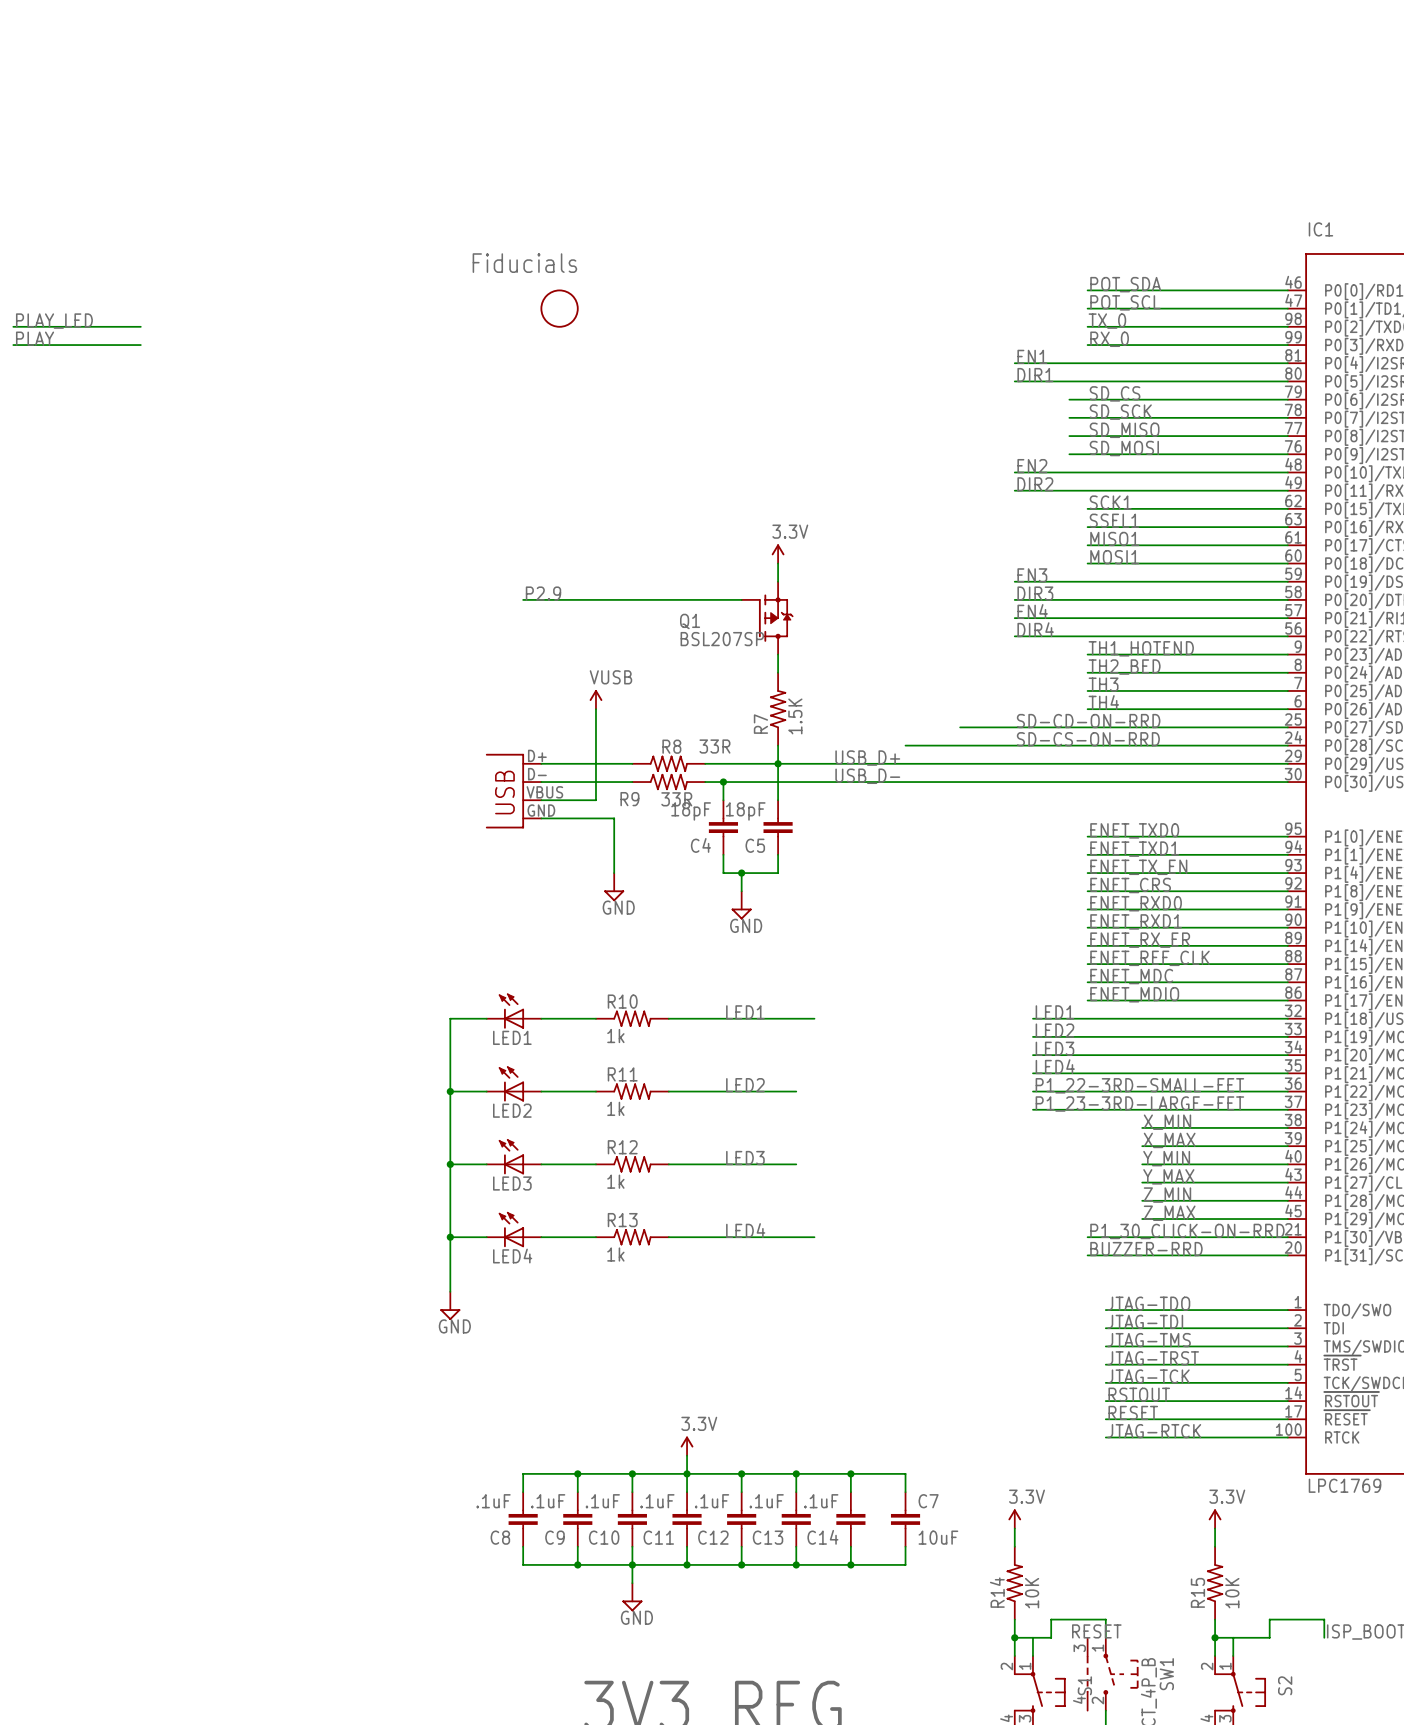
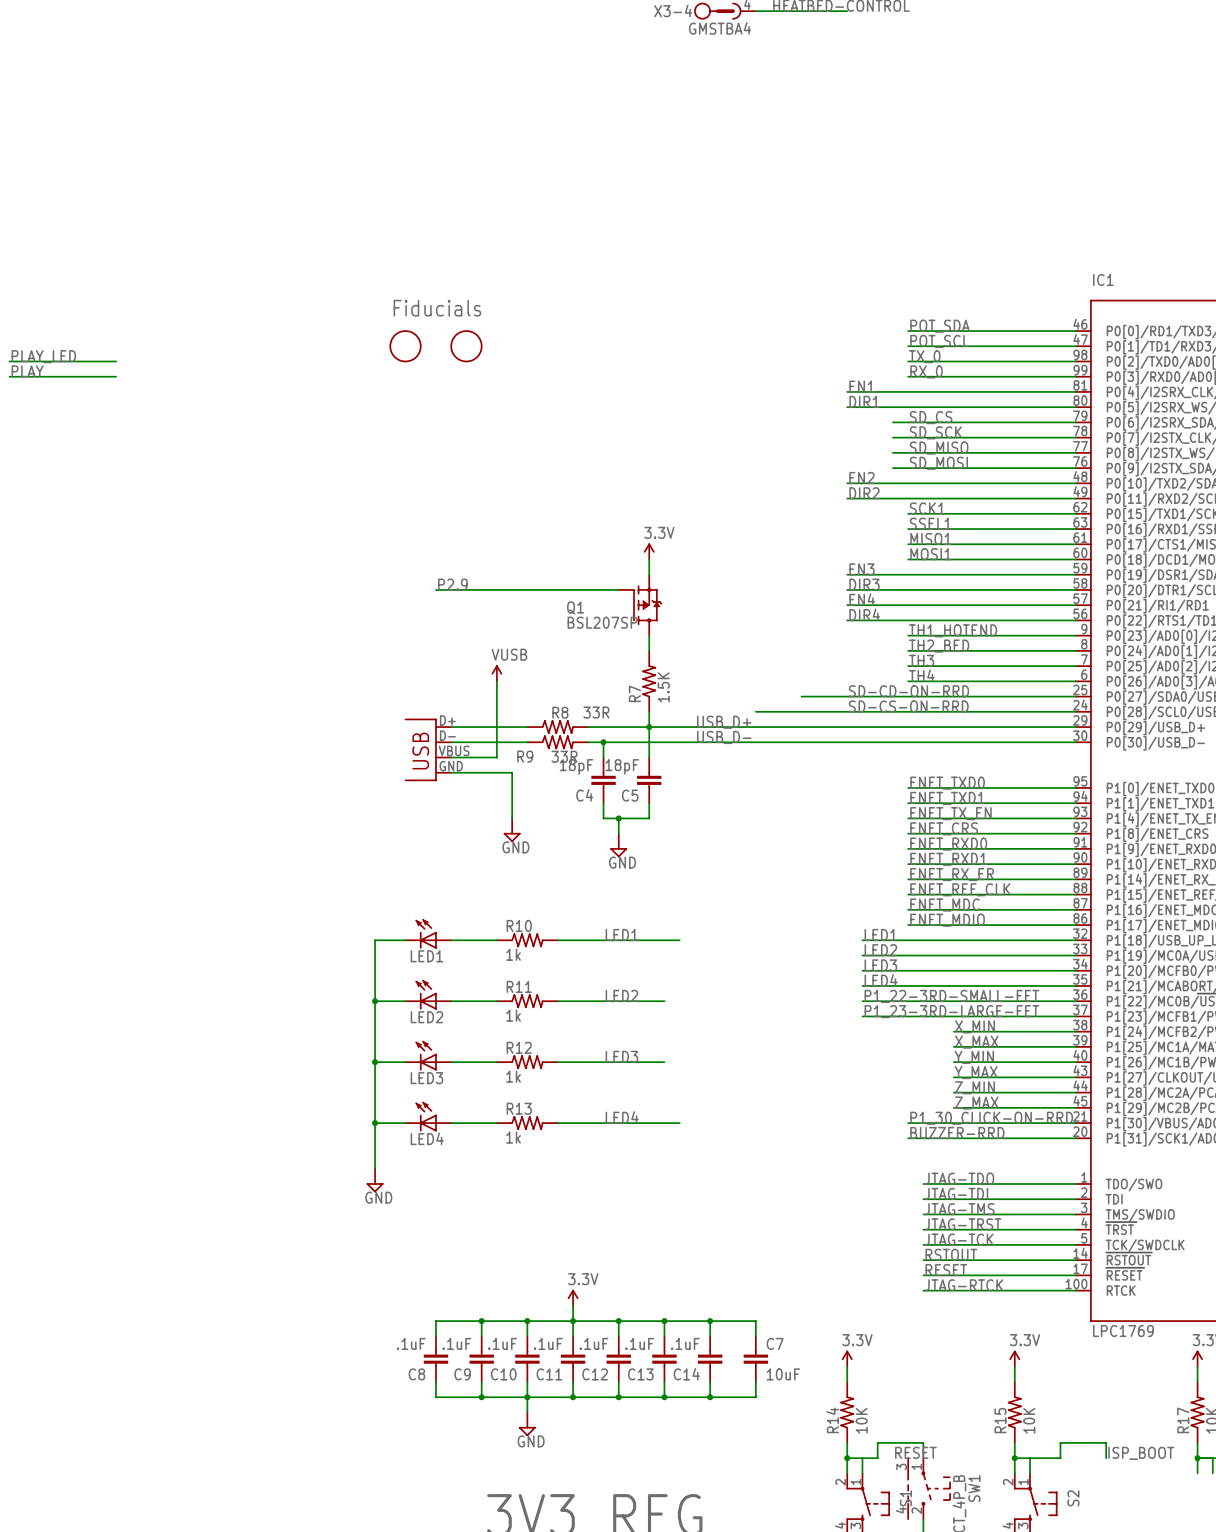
part: none -> (405, 346)

